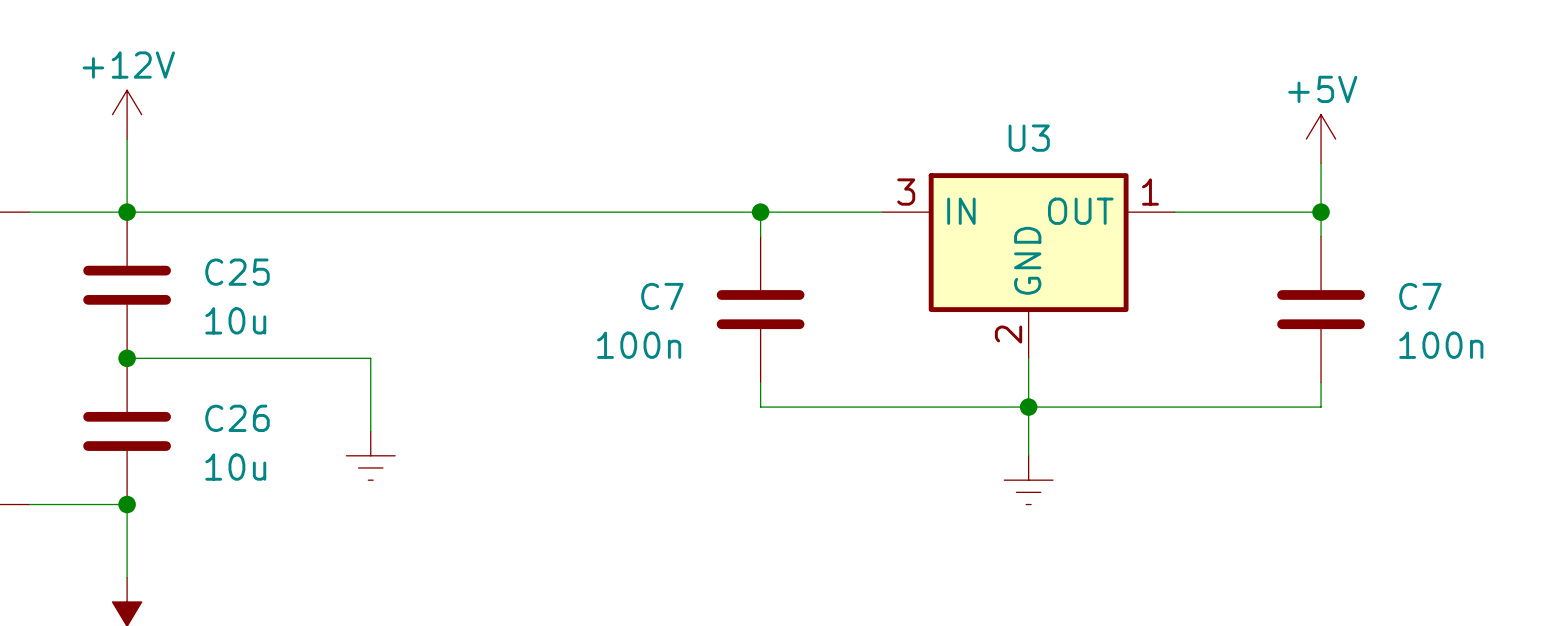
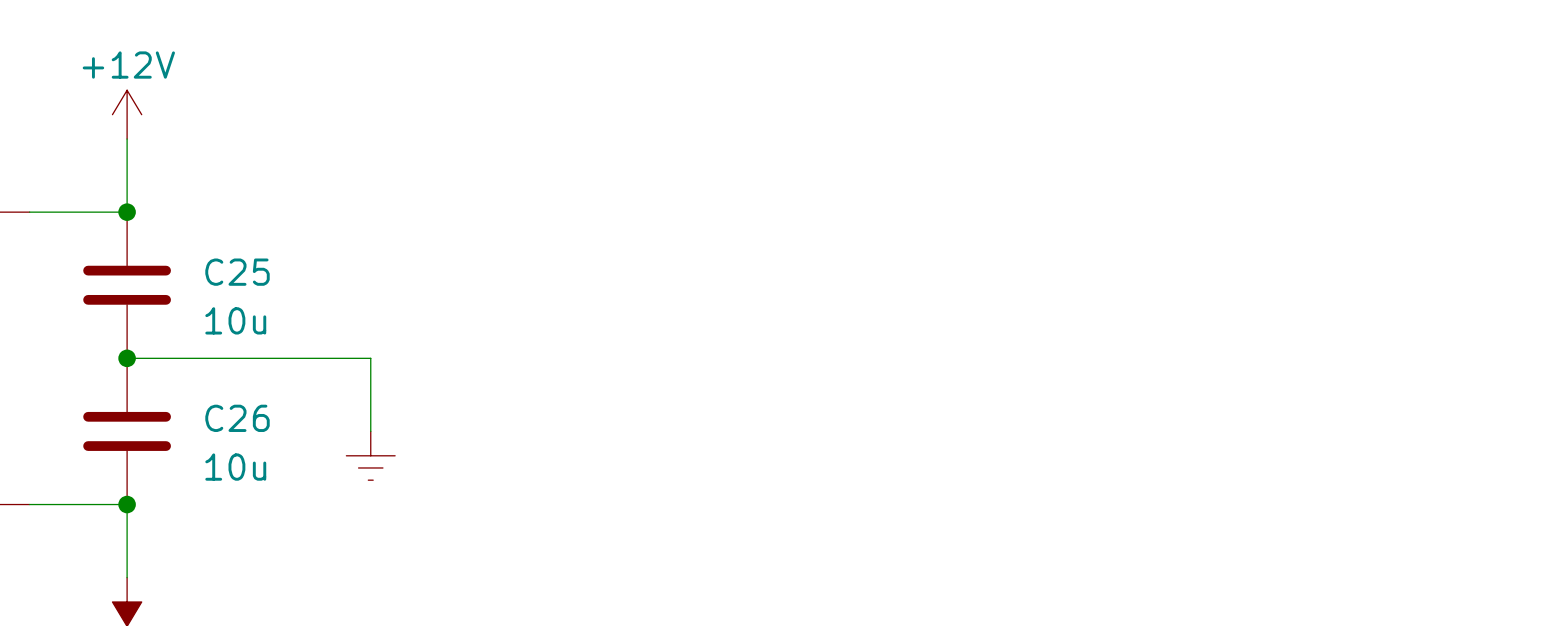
power symbol: +5V (1321, 139) -> none
wire: (1321, 163) (1321, 236) -> none
wire: (127, 212) (882, 212) -> none
wire: (760, 212) (760, 236) -> none
junction: (760, 212) -> none
wire: (1174, 212) (1321, 212) -> none
junction: (1321, 212) -> none
U3: (1028, 265) -> none
C7: 100n (760, 309) -> none
C7: 100n (1321, 309) -> none
wire: (1028, 358) (1028, 455) -> none
wire: (760, 382) (760, 407) (1321, 407) (1321, 382) -> none
junction: (1028, 407) -> none
power symbol: (1028, 480) -> none

